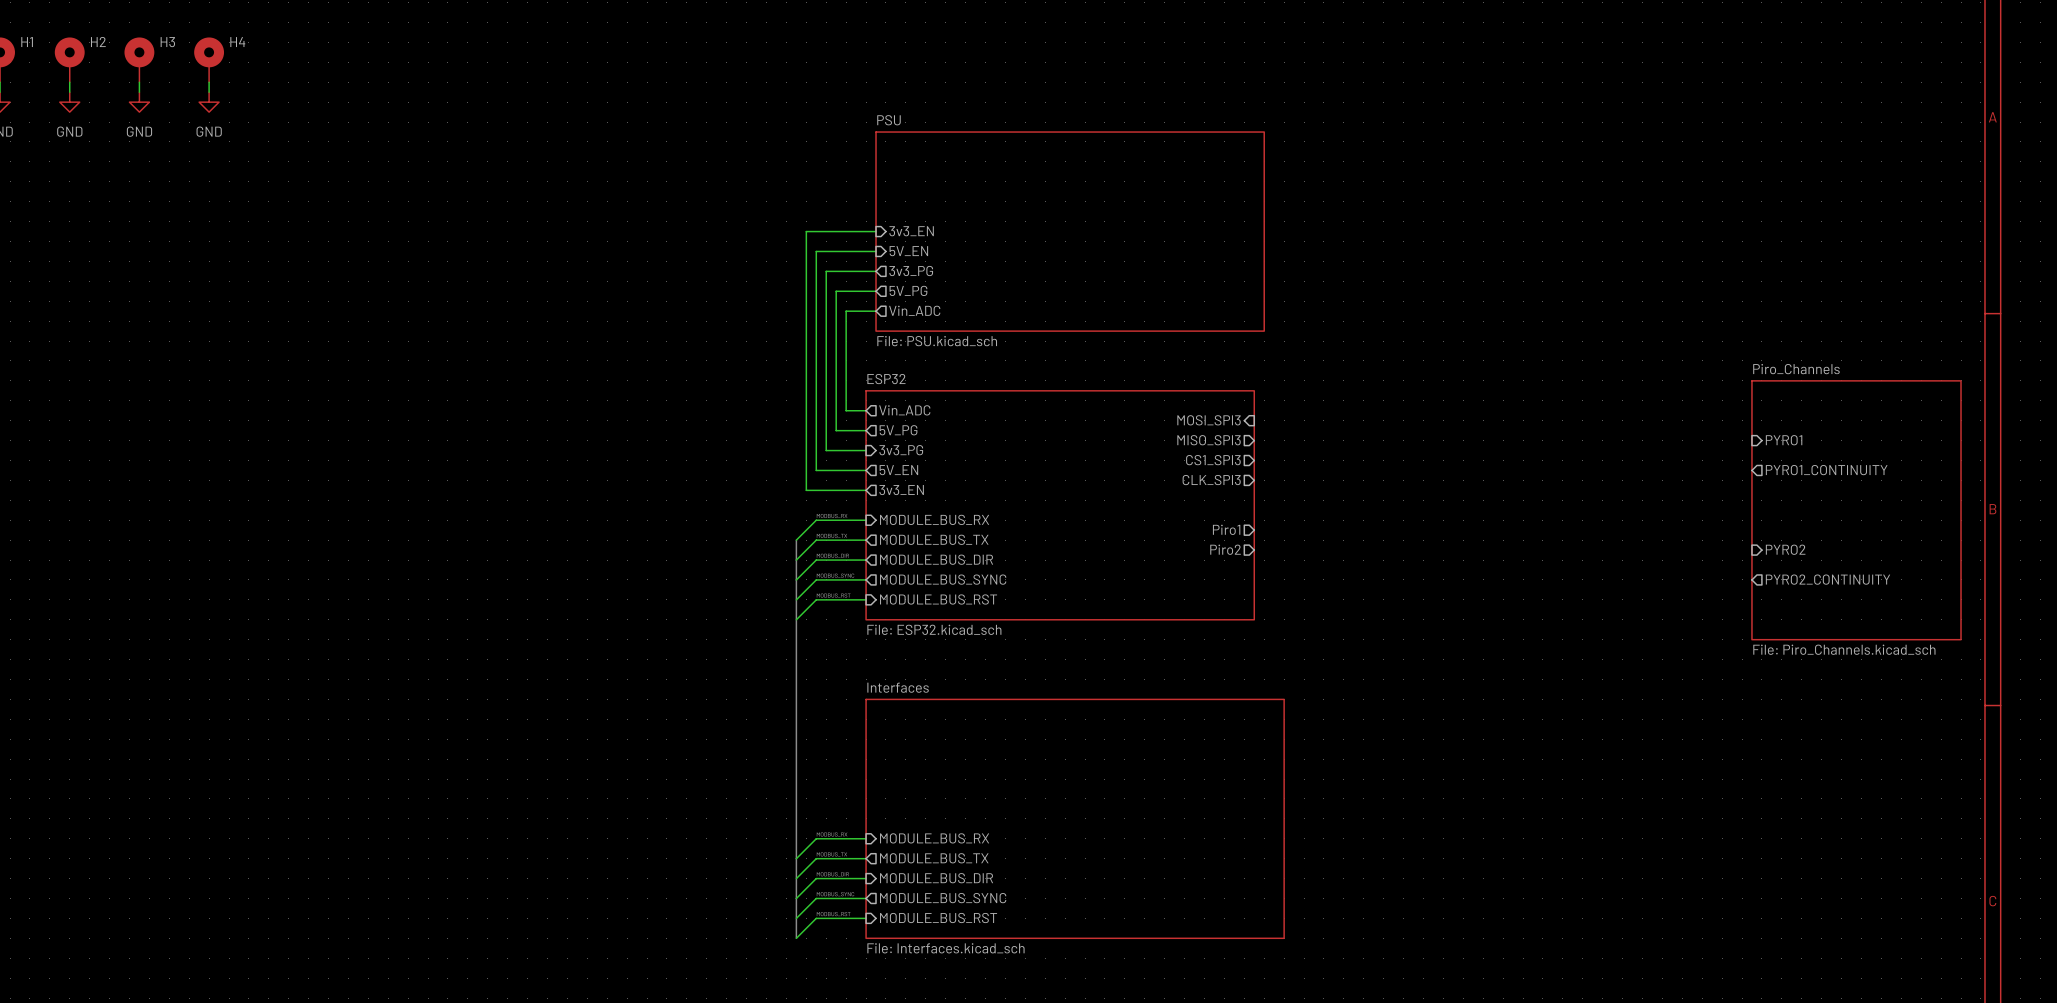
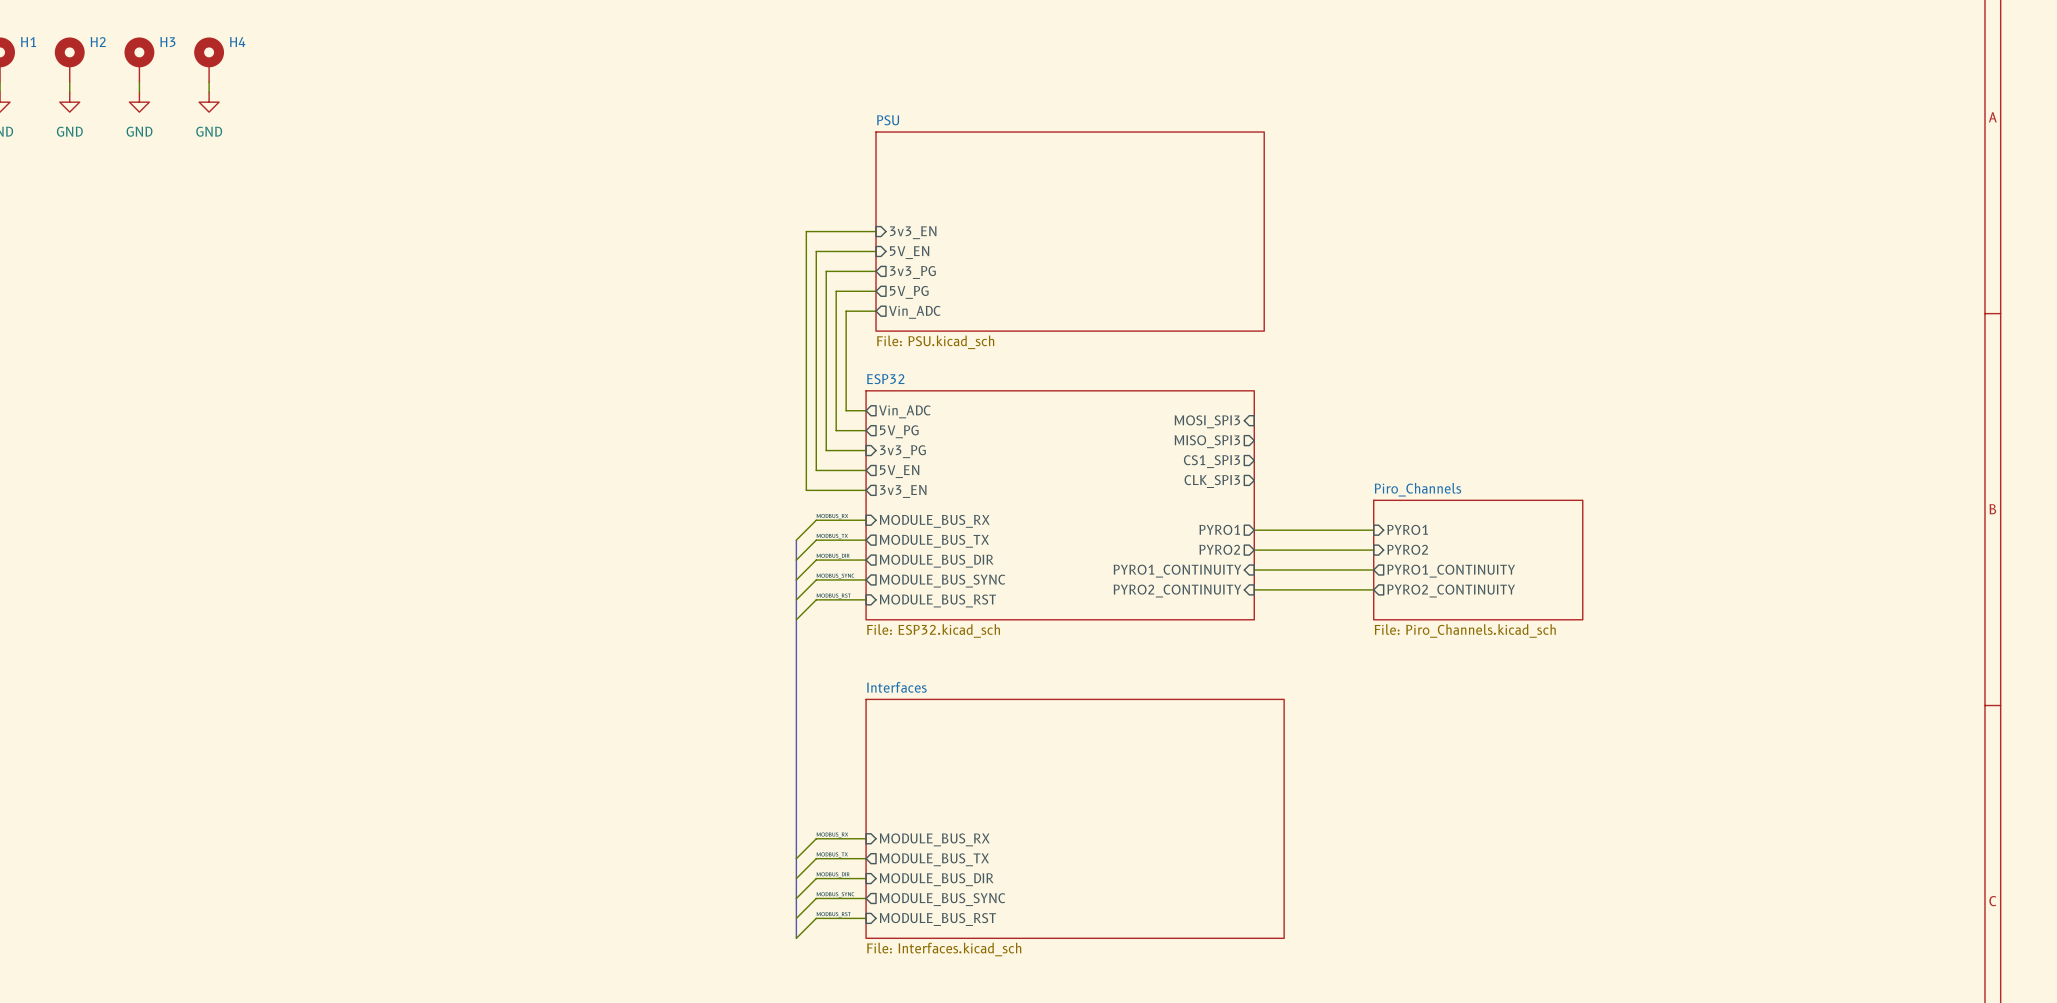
sheet pin: PYRO1 (1784, 440) -> none
sheet pin: PYRO1_CONTINUITY (1826, 470) -> none
sheet Piro_Channels: File: Piro_Channels.kicad_sch (1856, 510) -> none
sheet pin: Piro1 (1226, 529) -> PYRO1 (1219, 529)
sheet pin: none -> PYRO1 (1407, 529)
wire: none -> (1254, 530) (1373, 530)
sheet pin: Piro2 (1225, 549) -> PYRO2 (1219, 549)
sheet pin: none -> PYRO2 (1407, 549)
sheet pin: PYRO2 (1785, 549) -> none
wire: none -> (1254, 550) (1373, 550)
sheet Piro_Channels: none -> File: Piro_Channels.kicad_sch (1478, 560)
sheet pin: none -> PYRO1_CONTINUITY (1177, 571)
sheet pin: none -> PYRO1_CONTINUITY (1451, 571)
wire: none -> (1254, 570) (1373, 570)
sheet pin: PYRO2_CONTINUITY (1828, 579) -> none
sheet pin: none -> PYRO2_CONTINUITY (1177, 591)
wire: none -> (1254, 589) (1373, 589)
sheet pin: none -> PYRO2_CONTINUITY (1451, 591)

